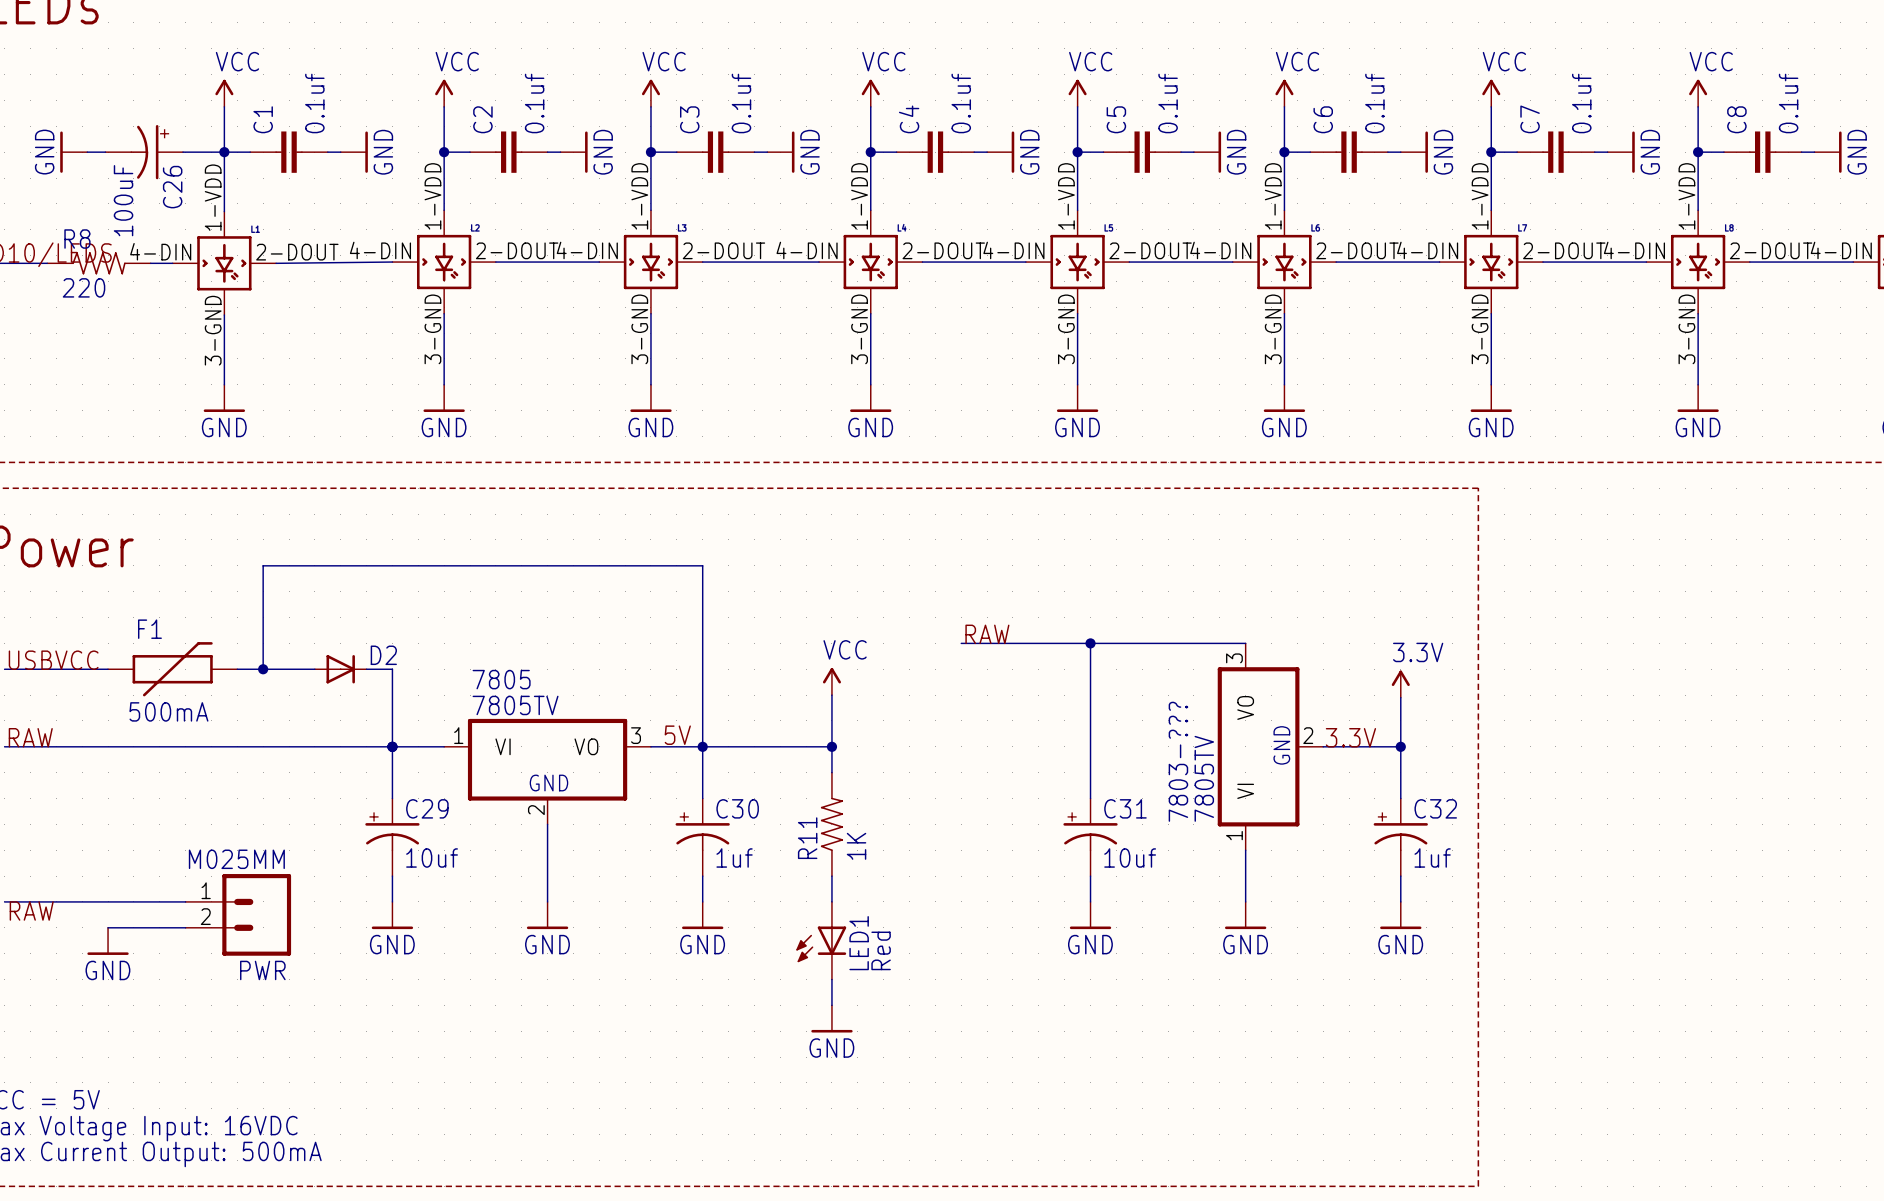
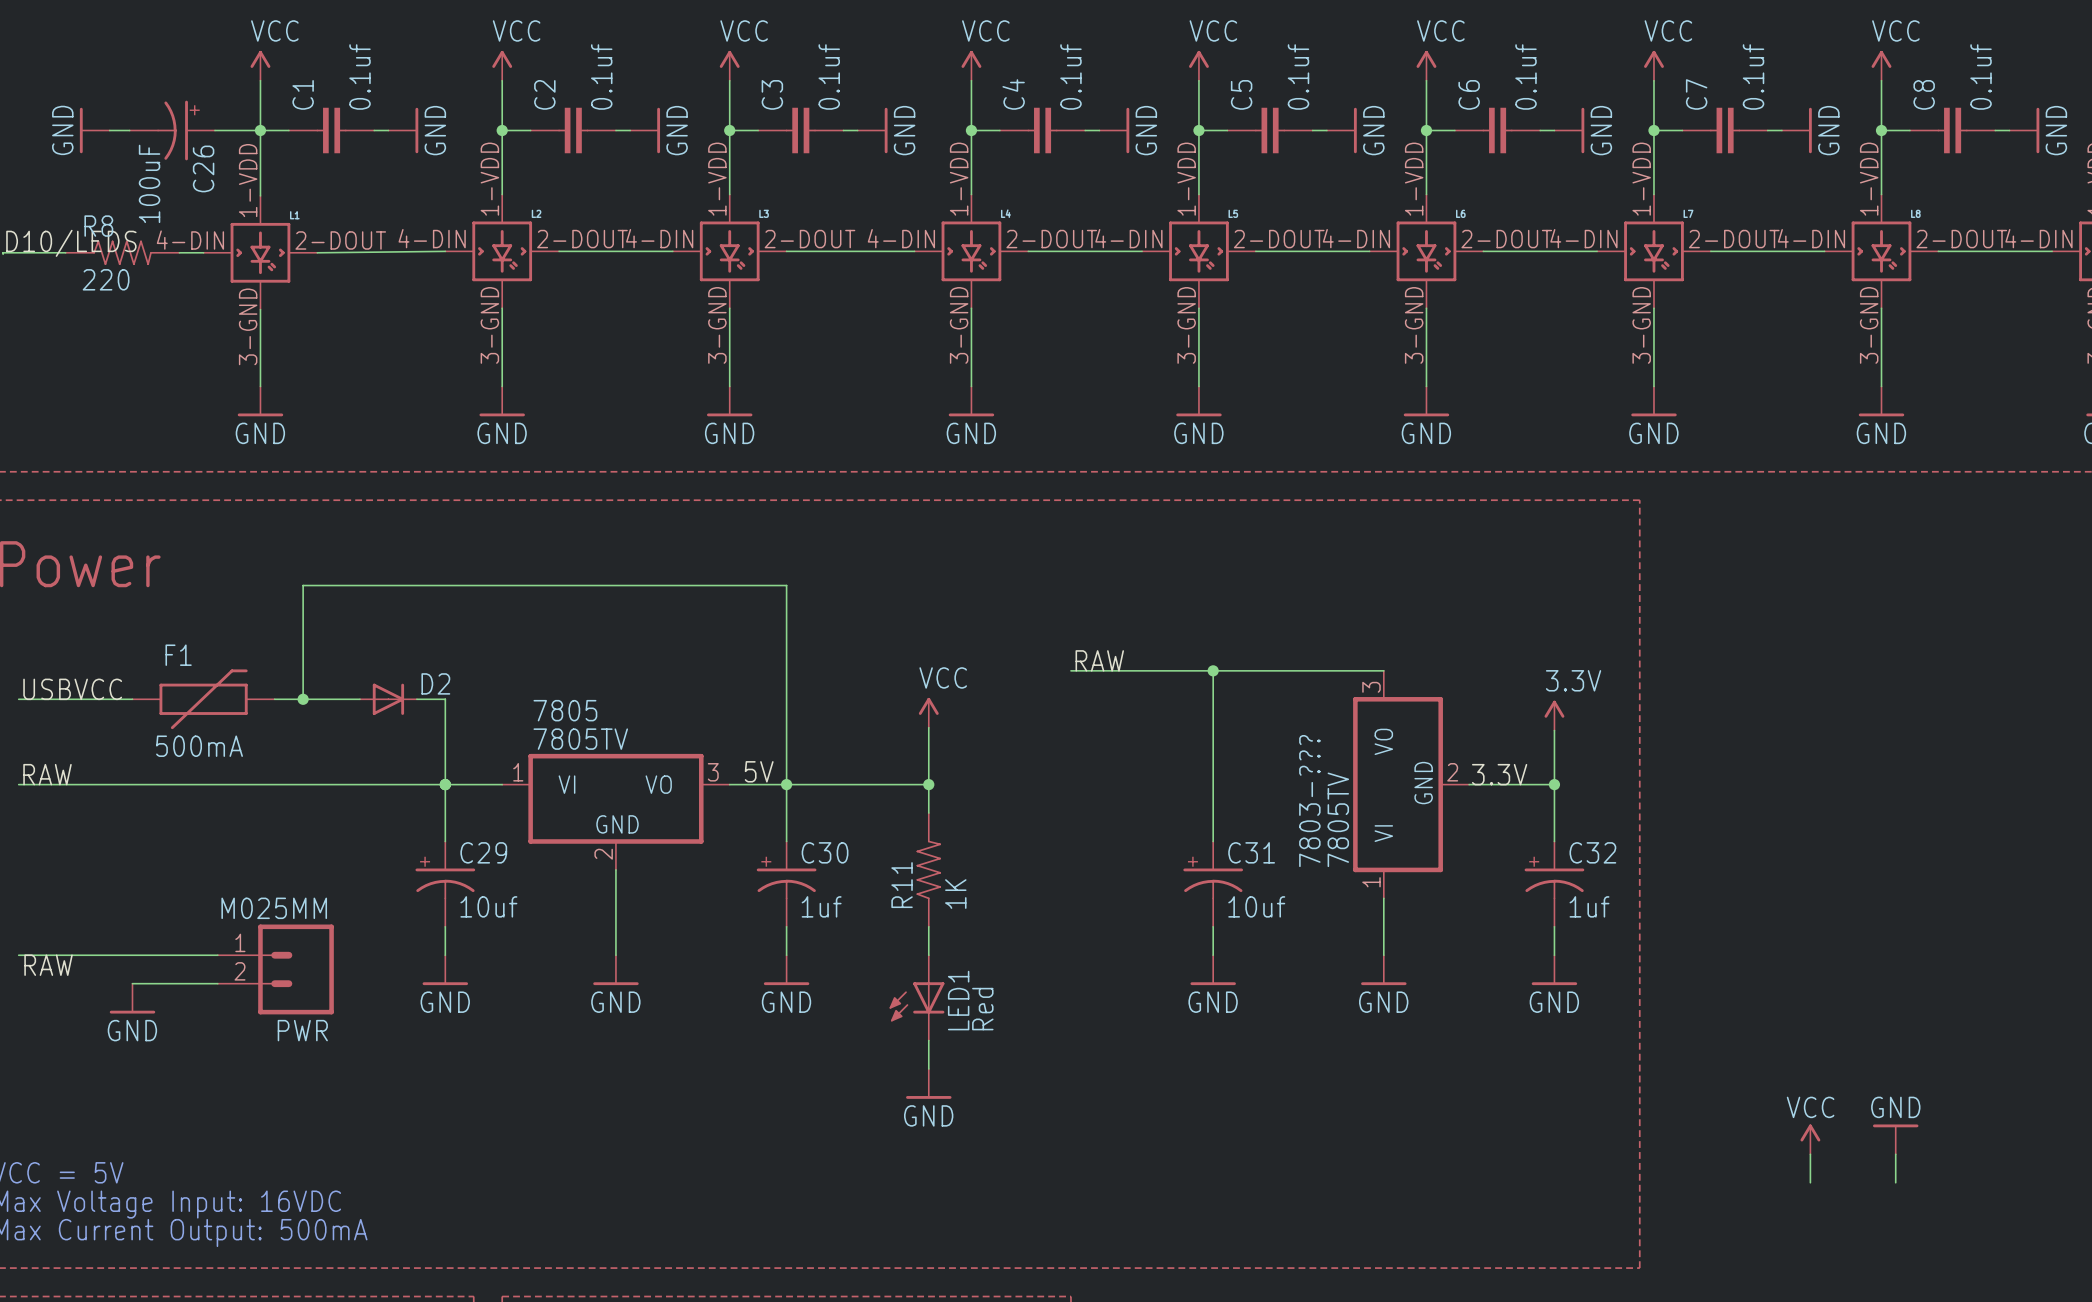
power symbol: none -> VCC (1810, 1139)
power symbol: none -> GND (1895, 1139)
wire: none -> (1810, 1154) (1810, 1182)
wire: none -> (1895, 1154) (1895, 1182)

